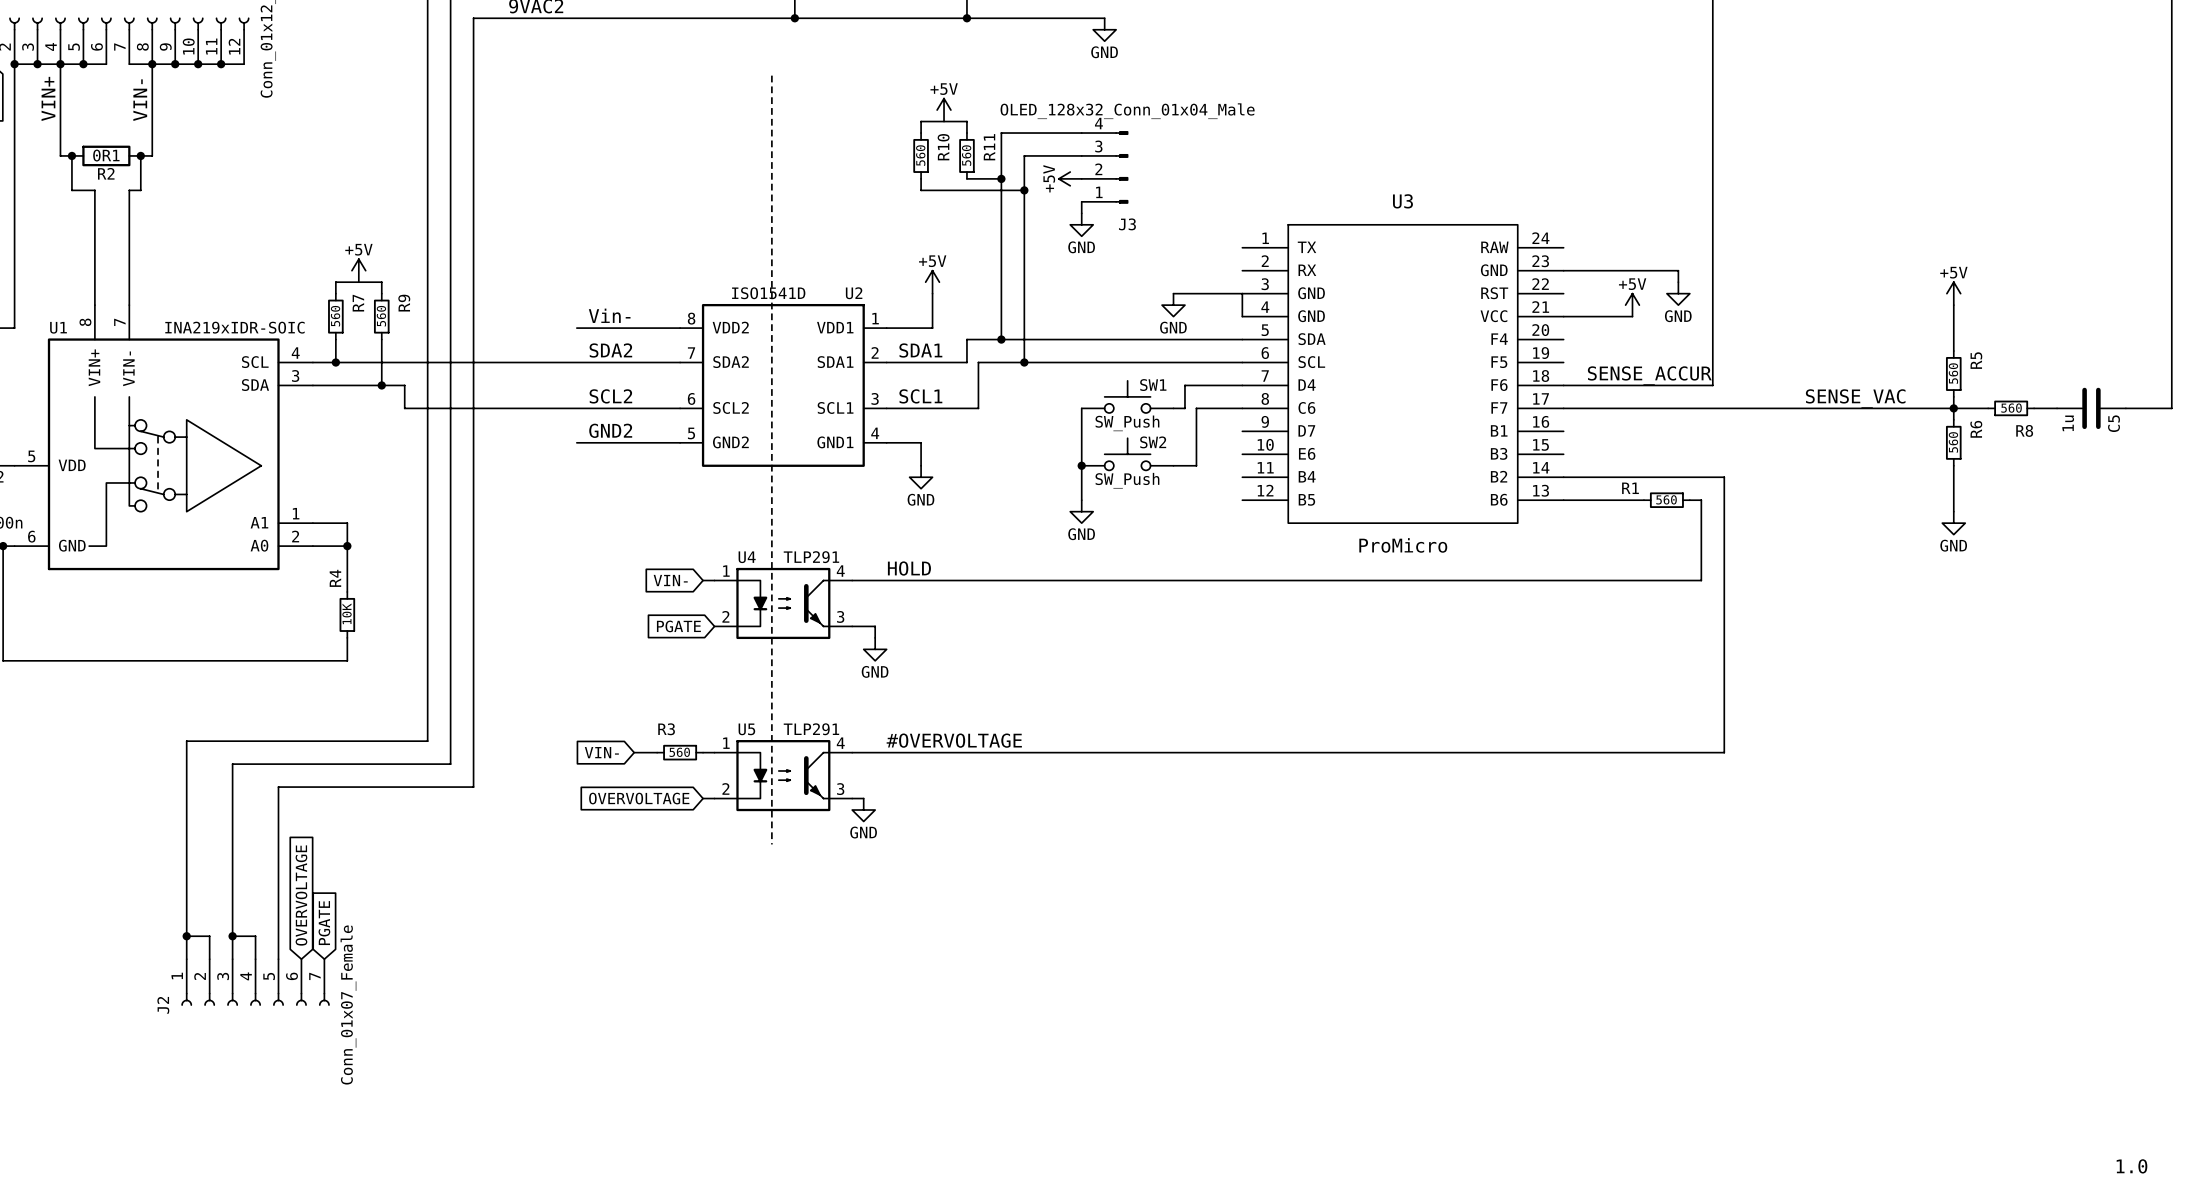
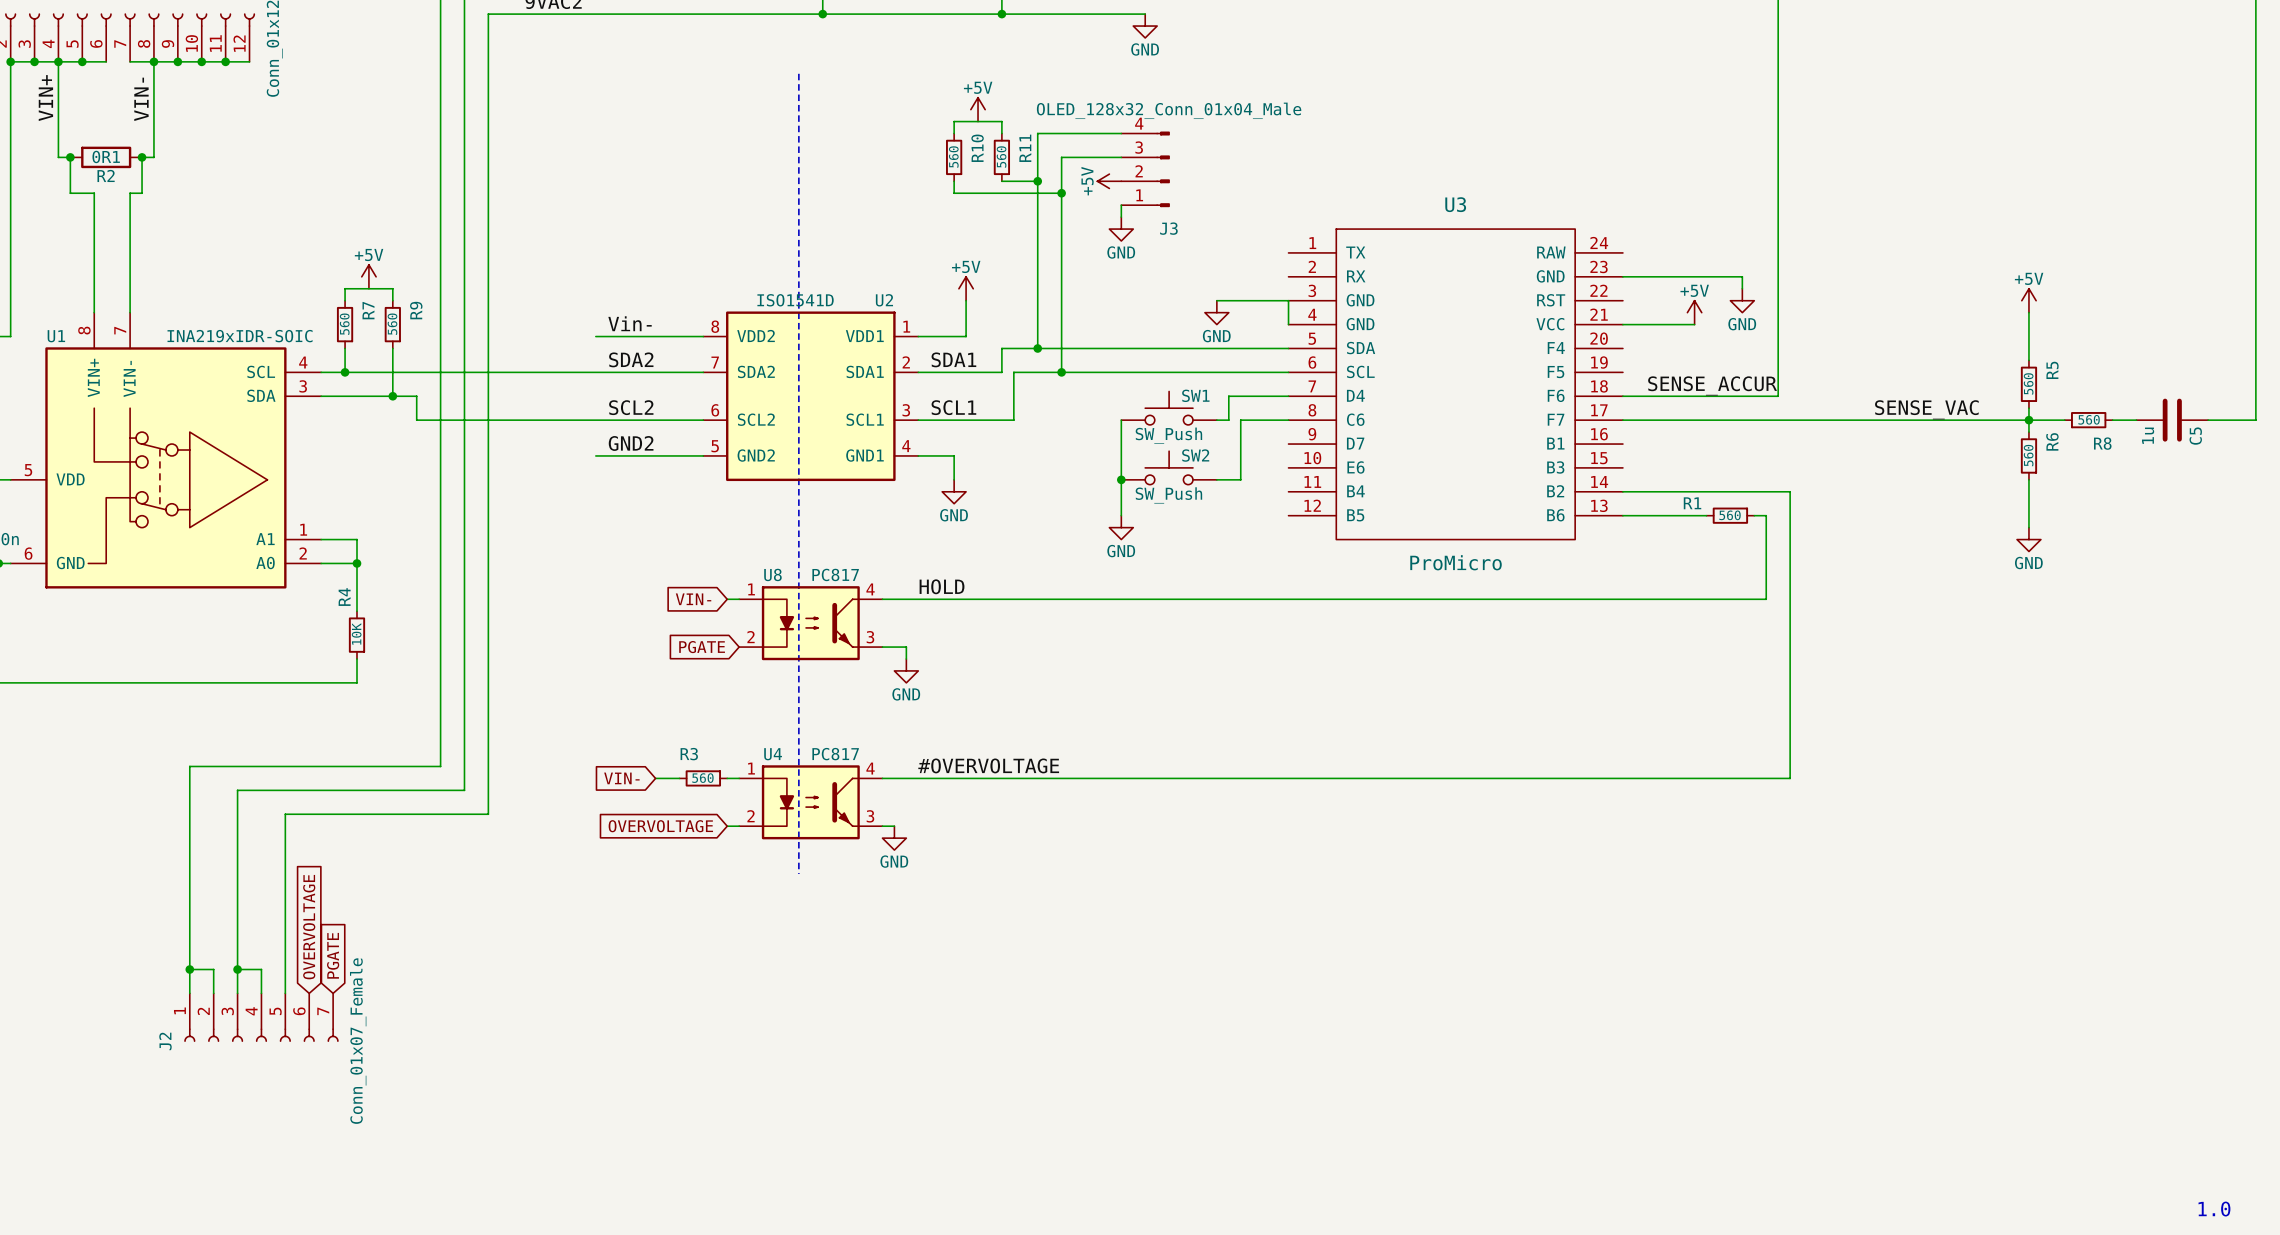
U4 name: U4 (747, 557) -> U8 (772, 574)
U4 value: TLP291 (811, 557) -> PC817 (835, 574)
U5 name: U5 (746, 729) -> U4 (773, 754)
U5 value: TLP291 (811, 729) -> PC817 (835, 754)

